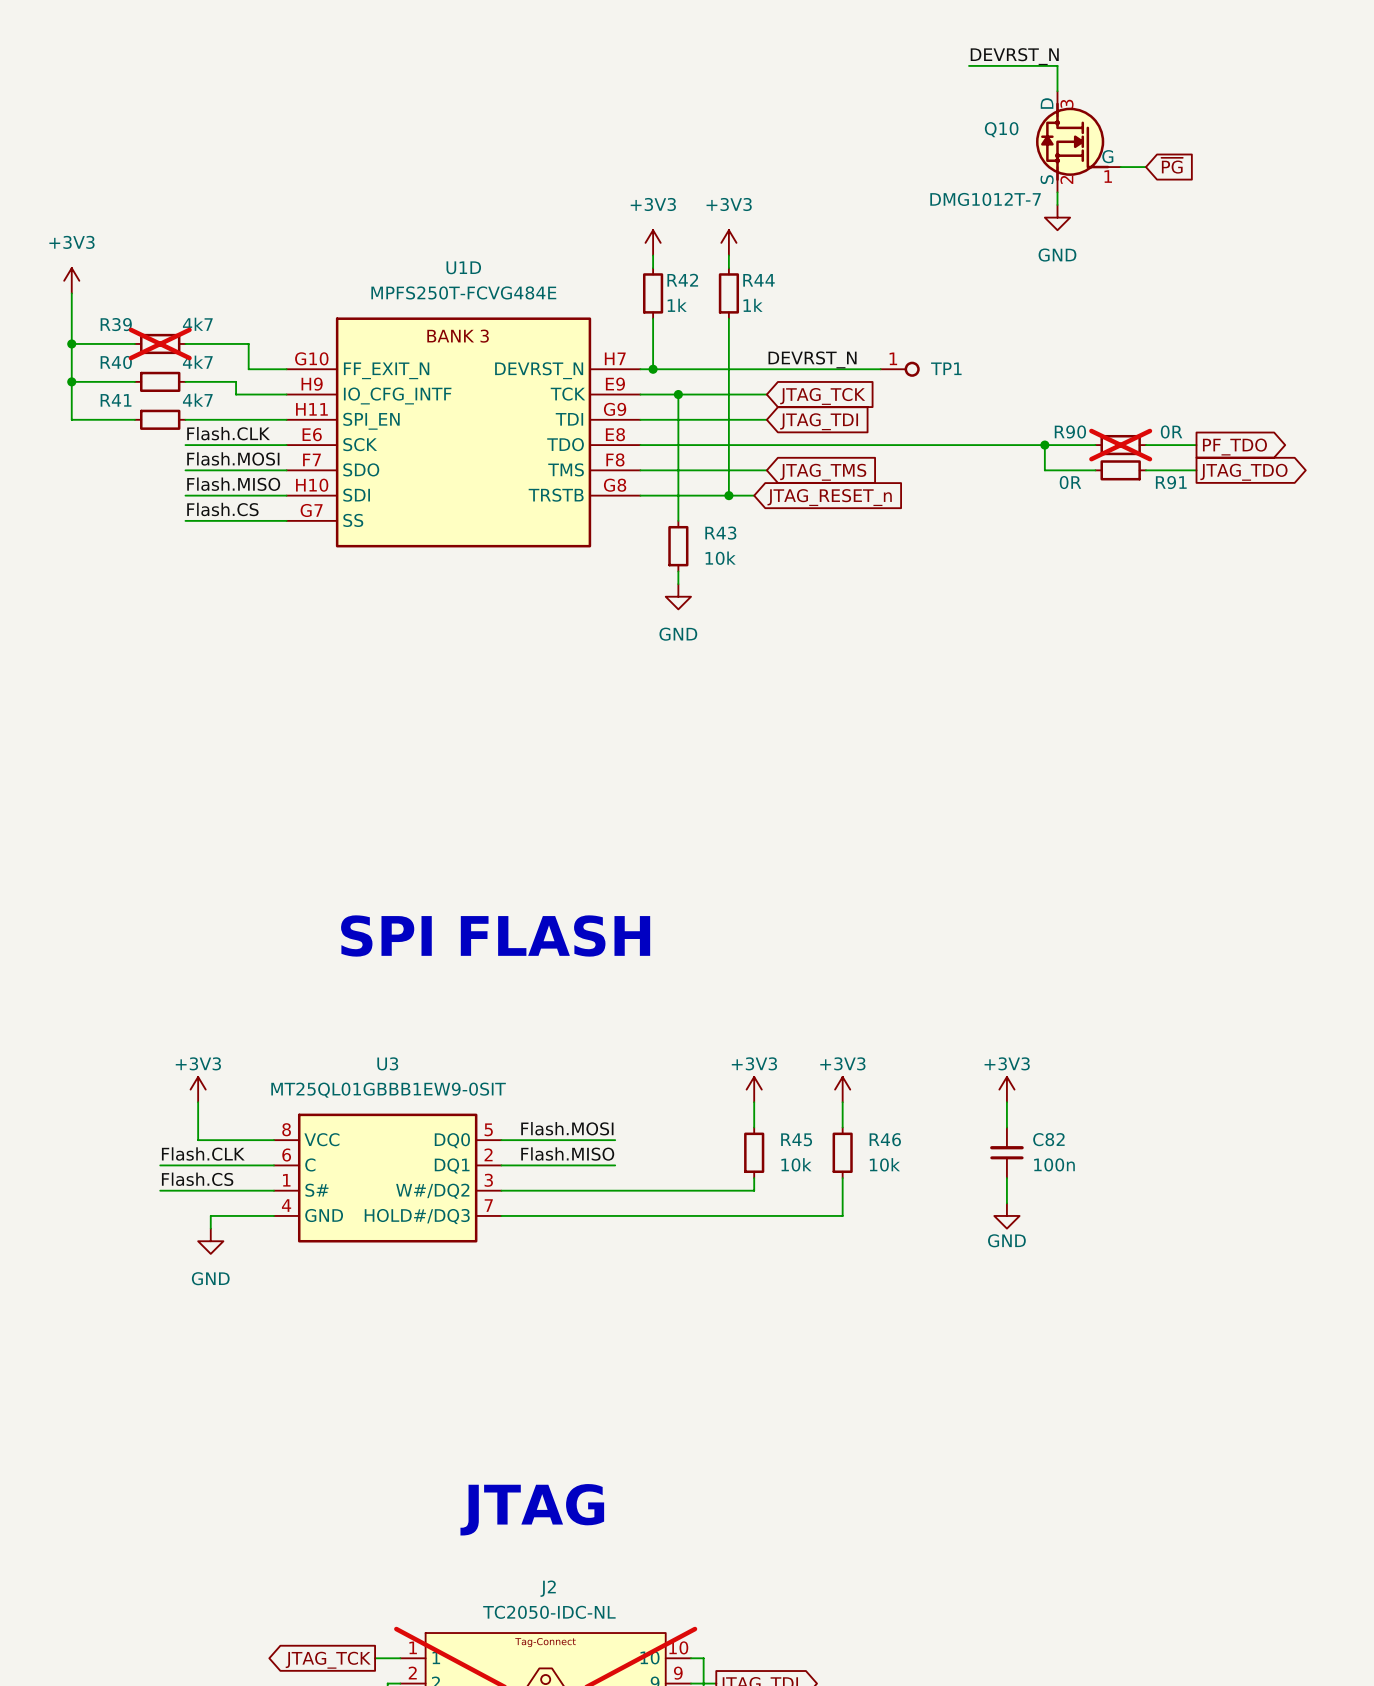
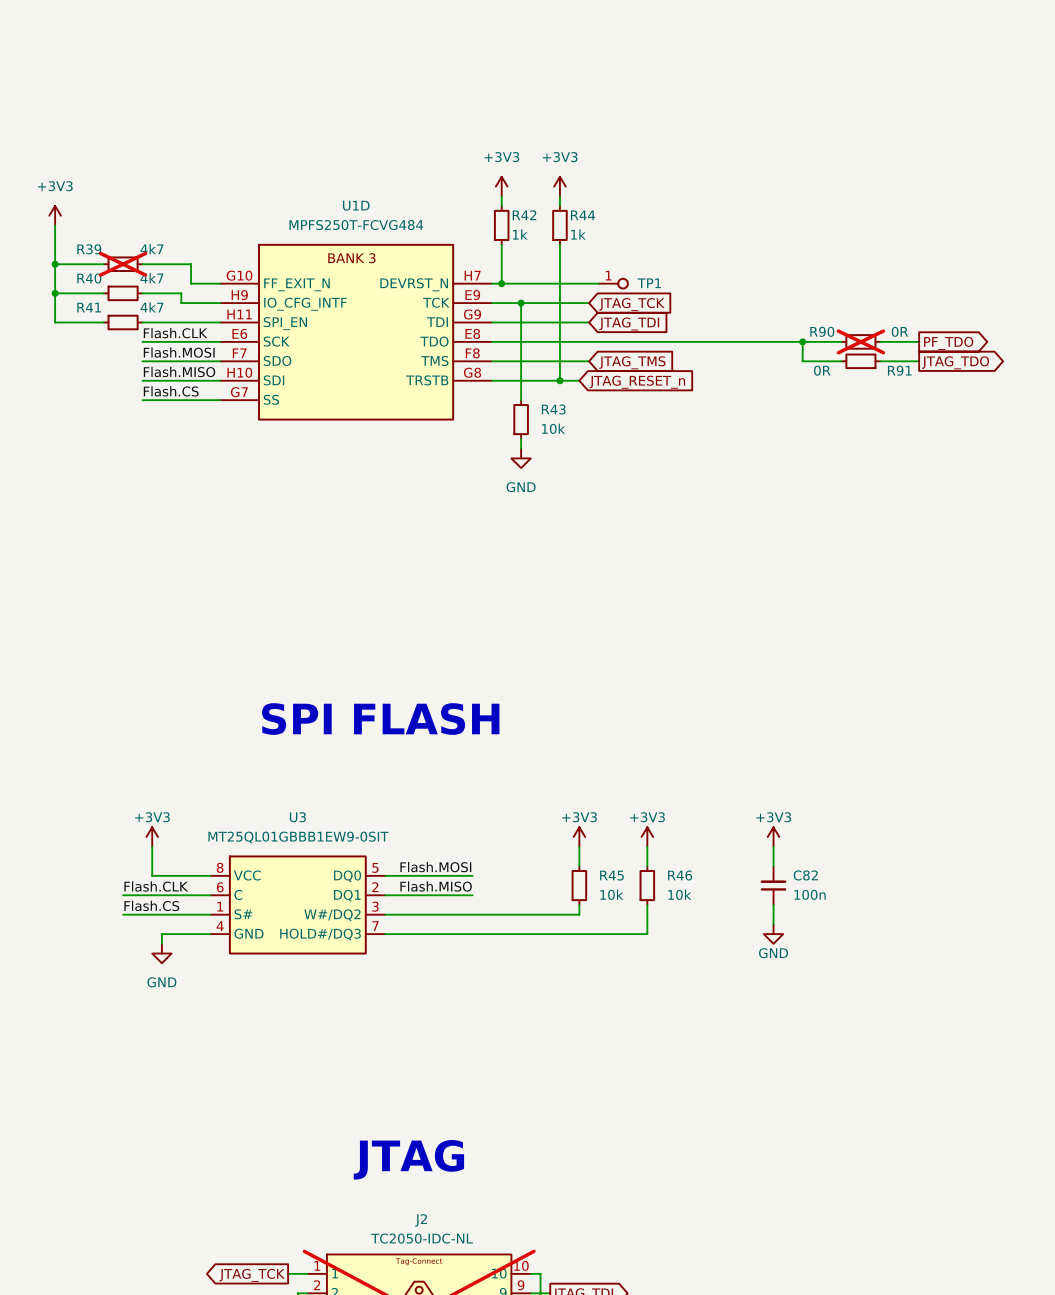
label: DEVRST_N (1014, 56) -> none
wire: (969, 65) (1057, 65) (1057, 91) -> none
Q10: (1078, 141) -> none
global label: ~{PG} (1172, 165) -> none
wire: (1120, 167) (1145, 167) -> none
wire: (1057, 192) (1057, 204) -> none
power symbol: GND (1057, 217) -> none
U1D text: MPFS250T-FCVG484E (463, 292) -> MPFS250T-FCVG484 (356, 225)
label: DEVRST_N (812, 359) -> none
wire: (779, 369) (880, 369) -> none
TP1 position: (900, 369) -> (613, 283)

